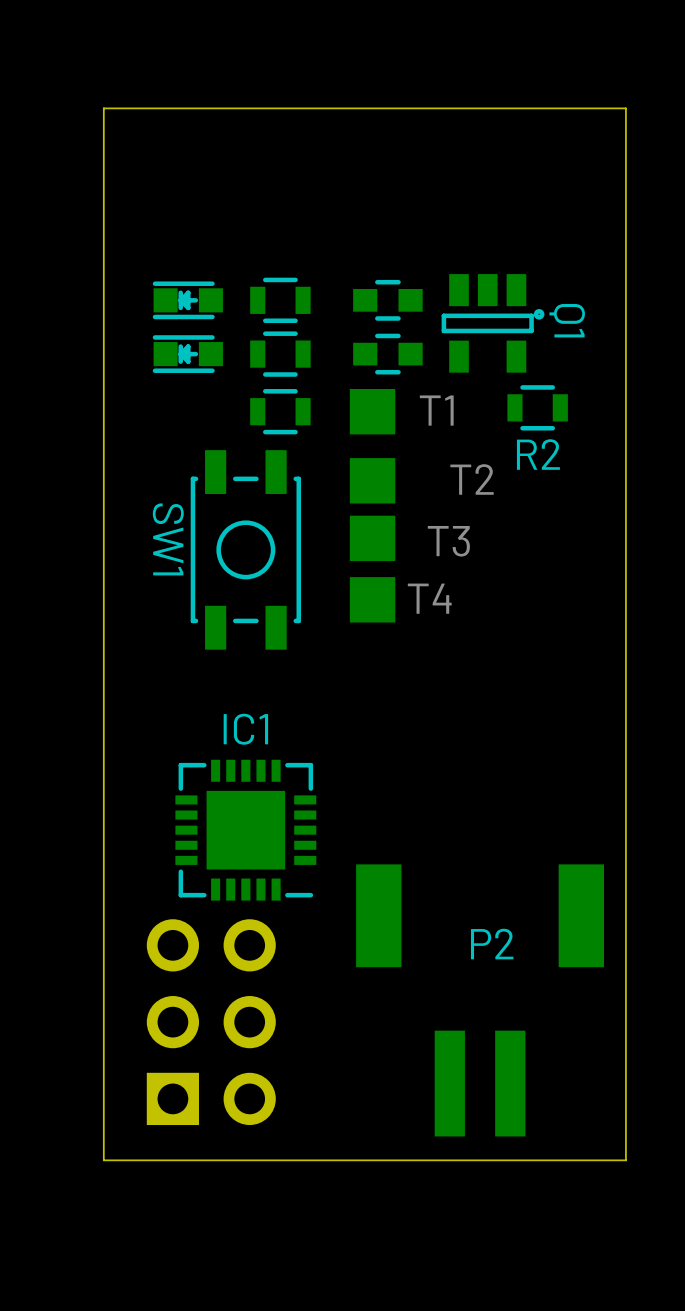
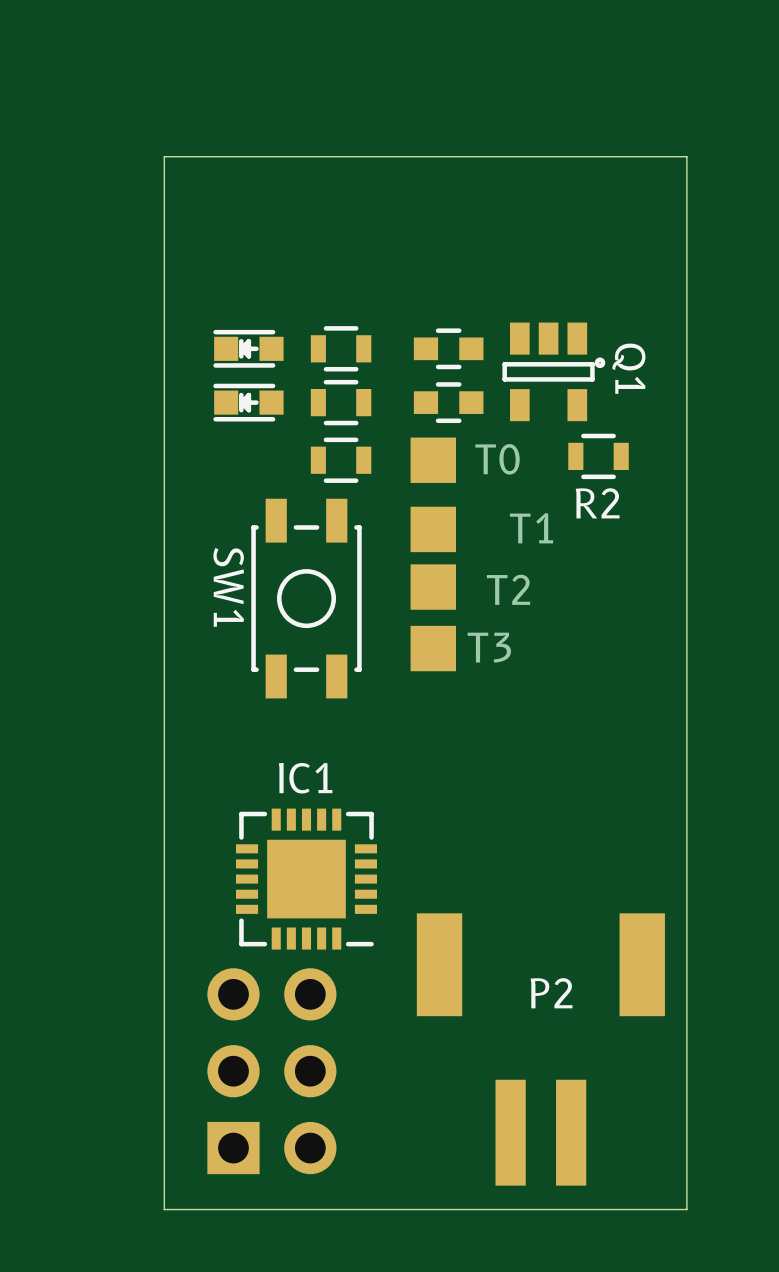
part value: T1 (436, 410) -> T0 (497, 459)
part value: T2 (472, 479) -> T1 (531, 528)
part value: T3 (448, 541) -> T2 (508, 589)
part value: T4 (429, 598) -> T3 (489, 647)

